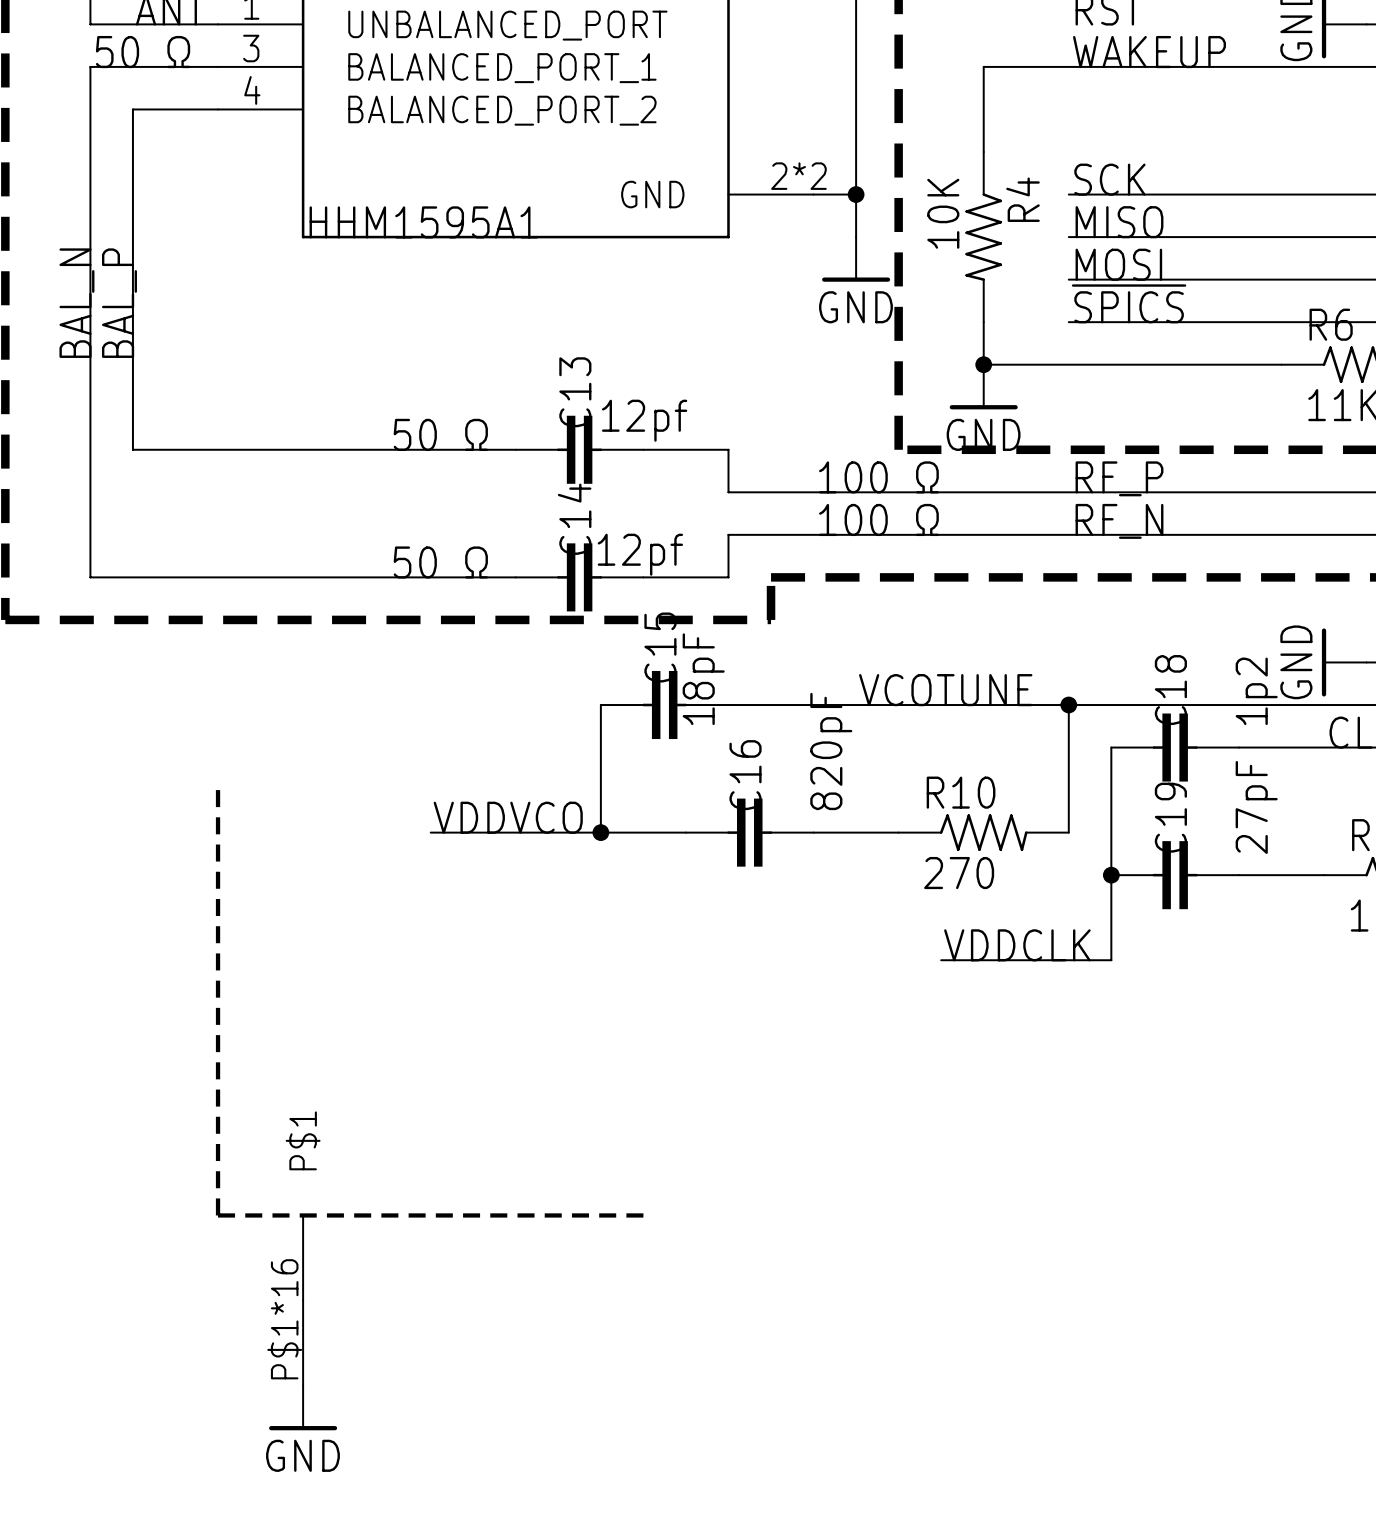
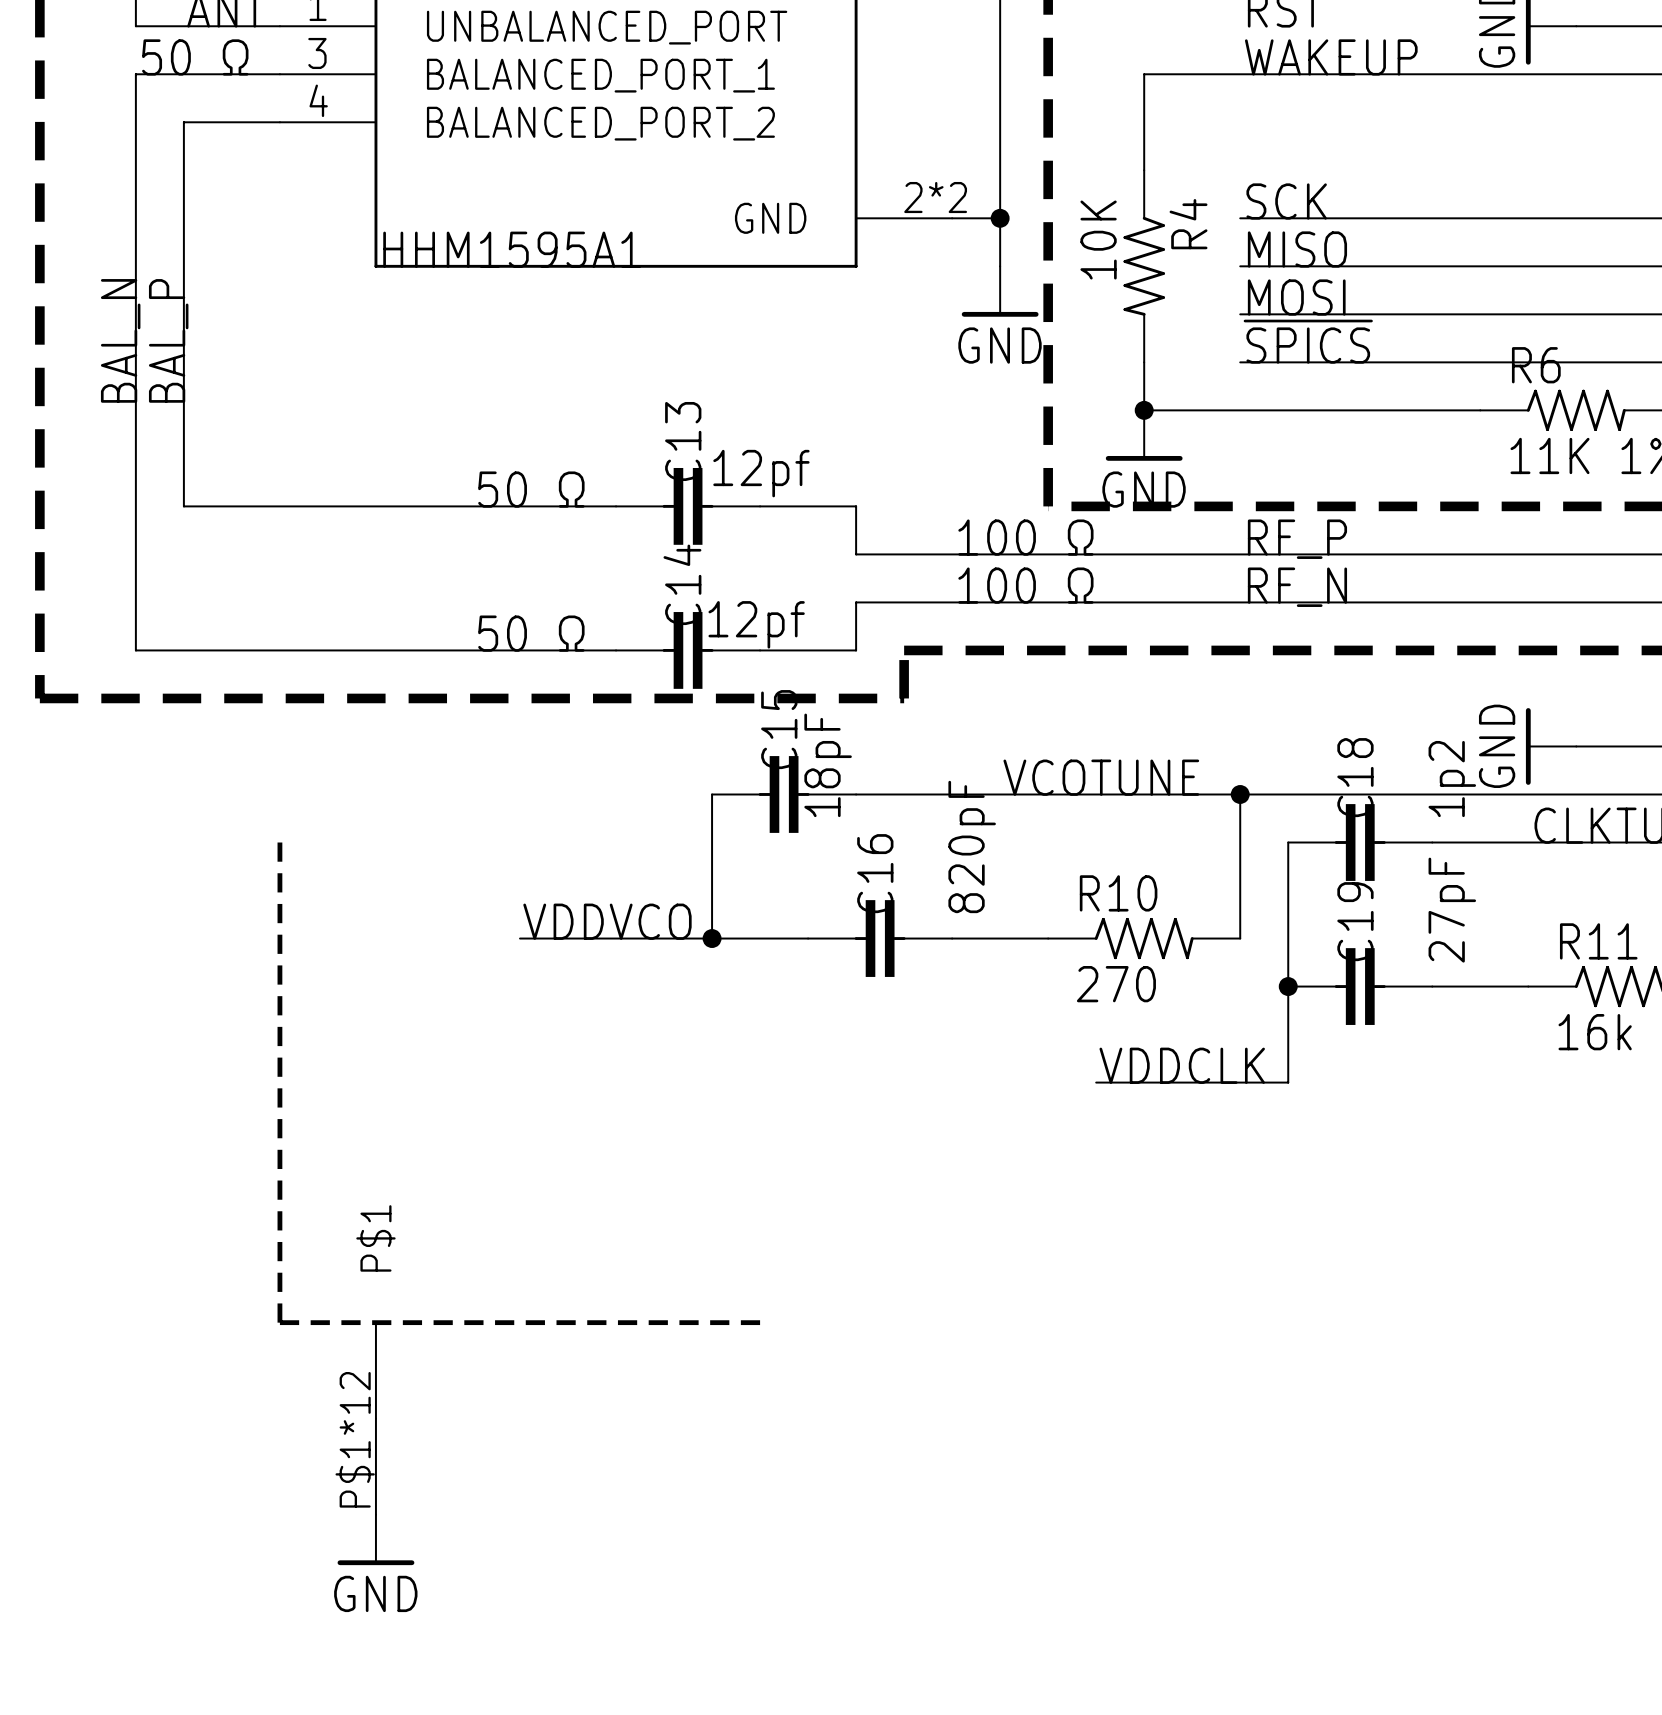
part: none -> (520, 1129)
part: (430, 1044) -> none
power symbol position: GND (303, 1407) -> GND (375, 1539)

